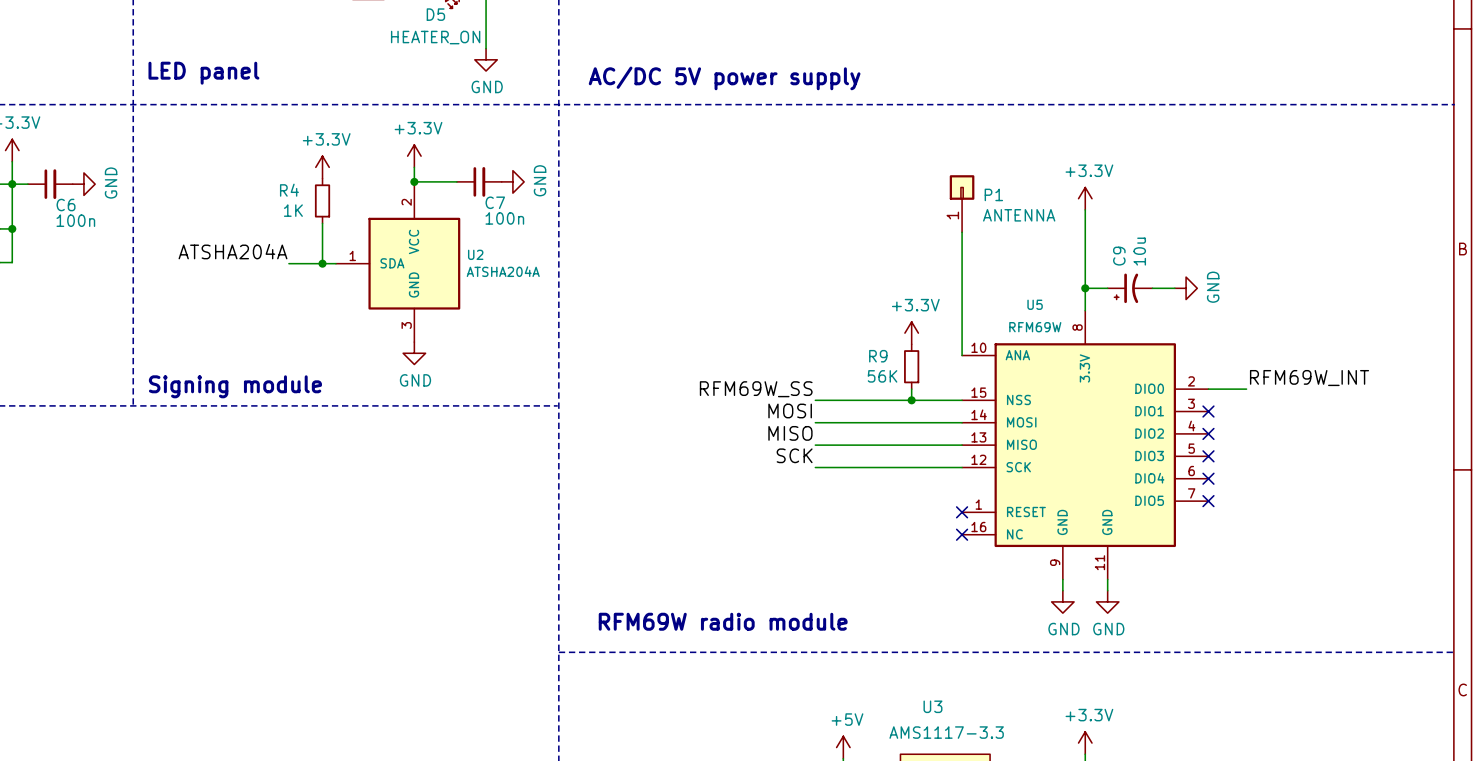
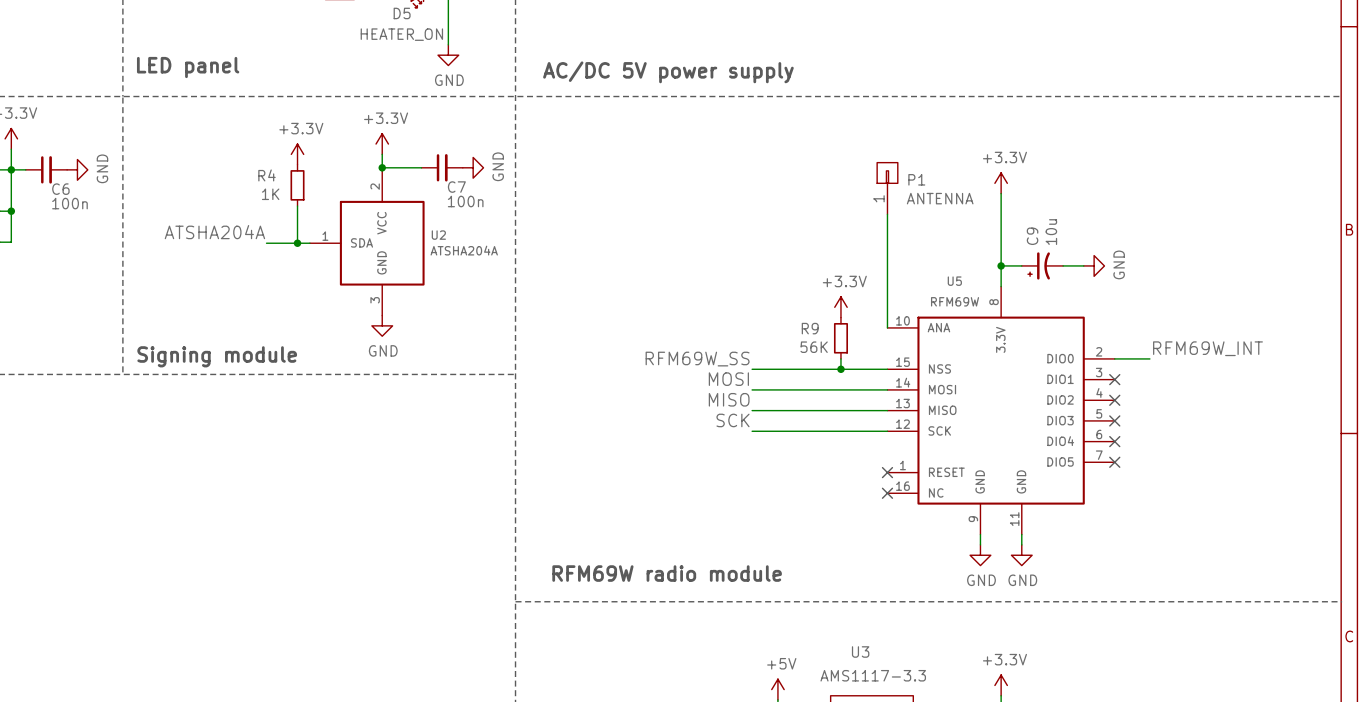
P1 symbol: [949, 175, 975, 233] -> [877, 162, 898, 215]

